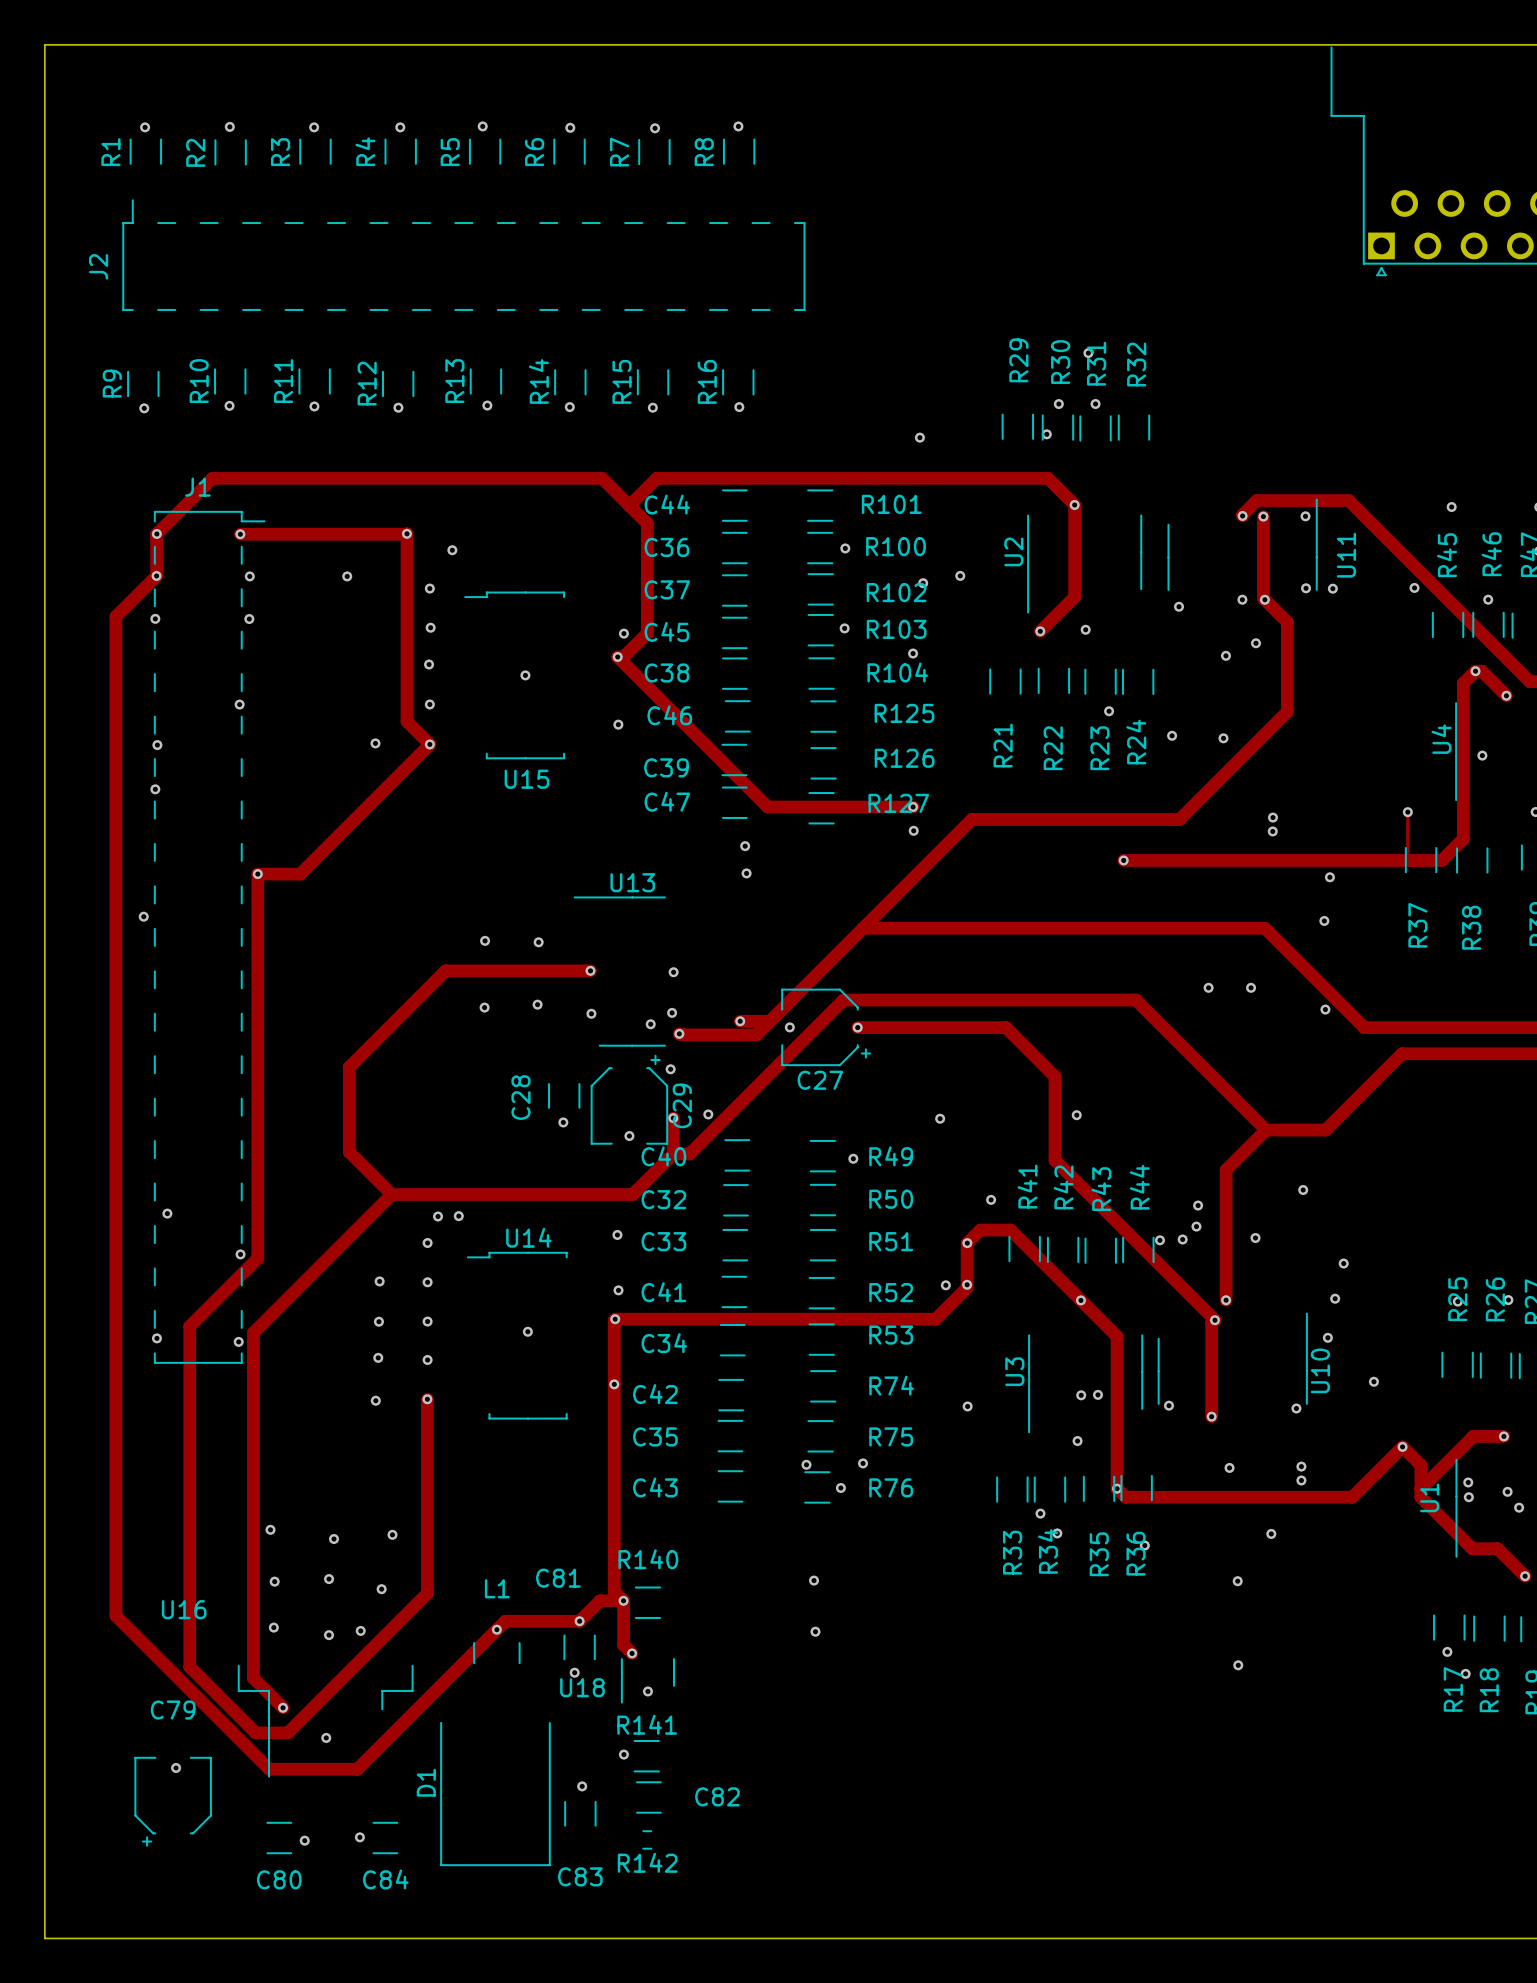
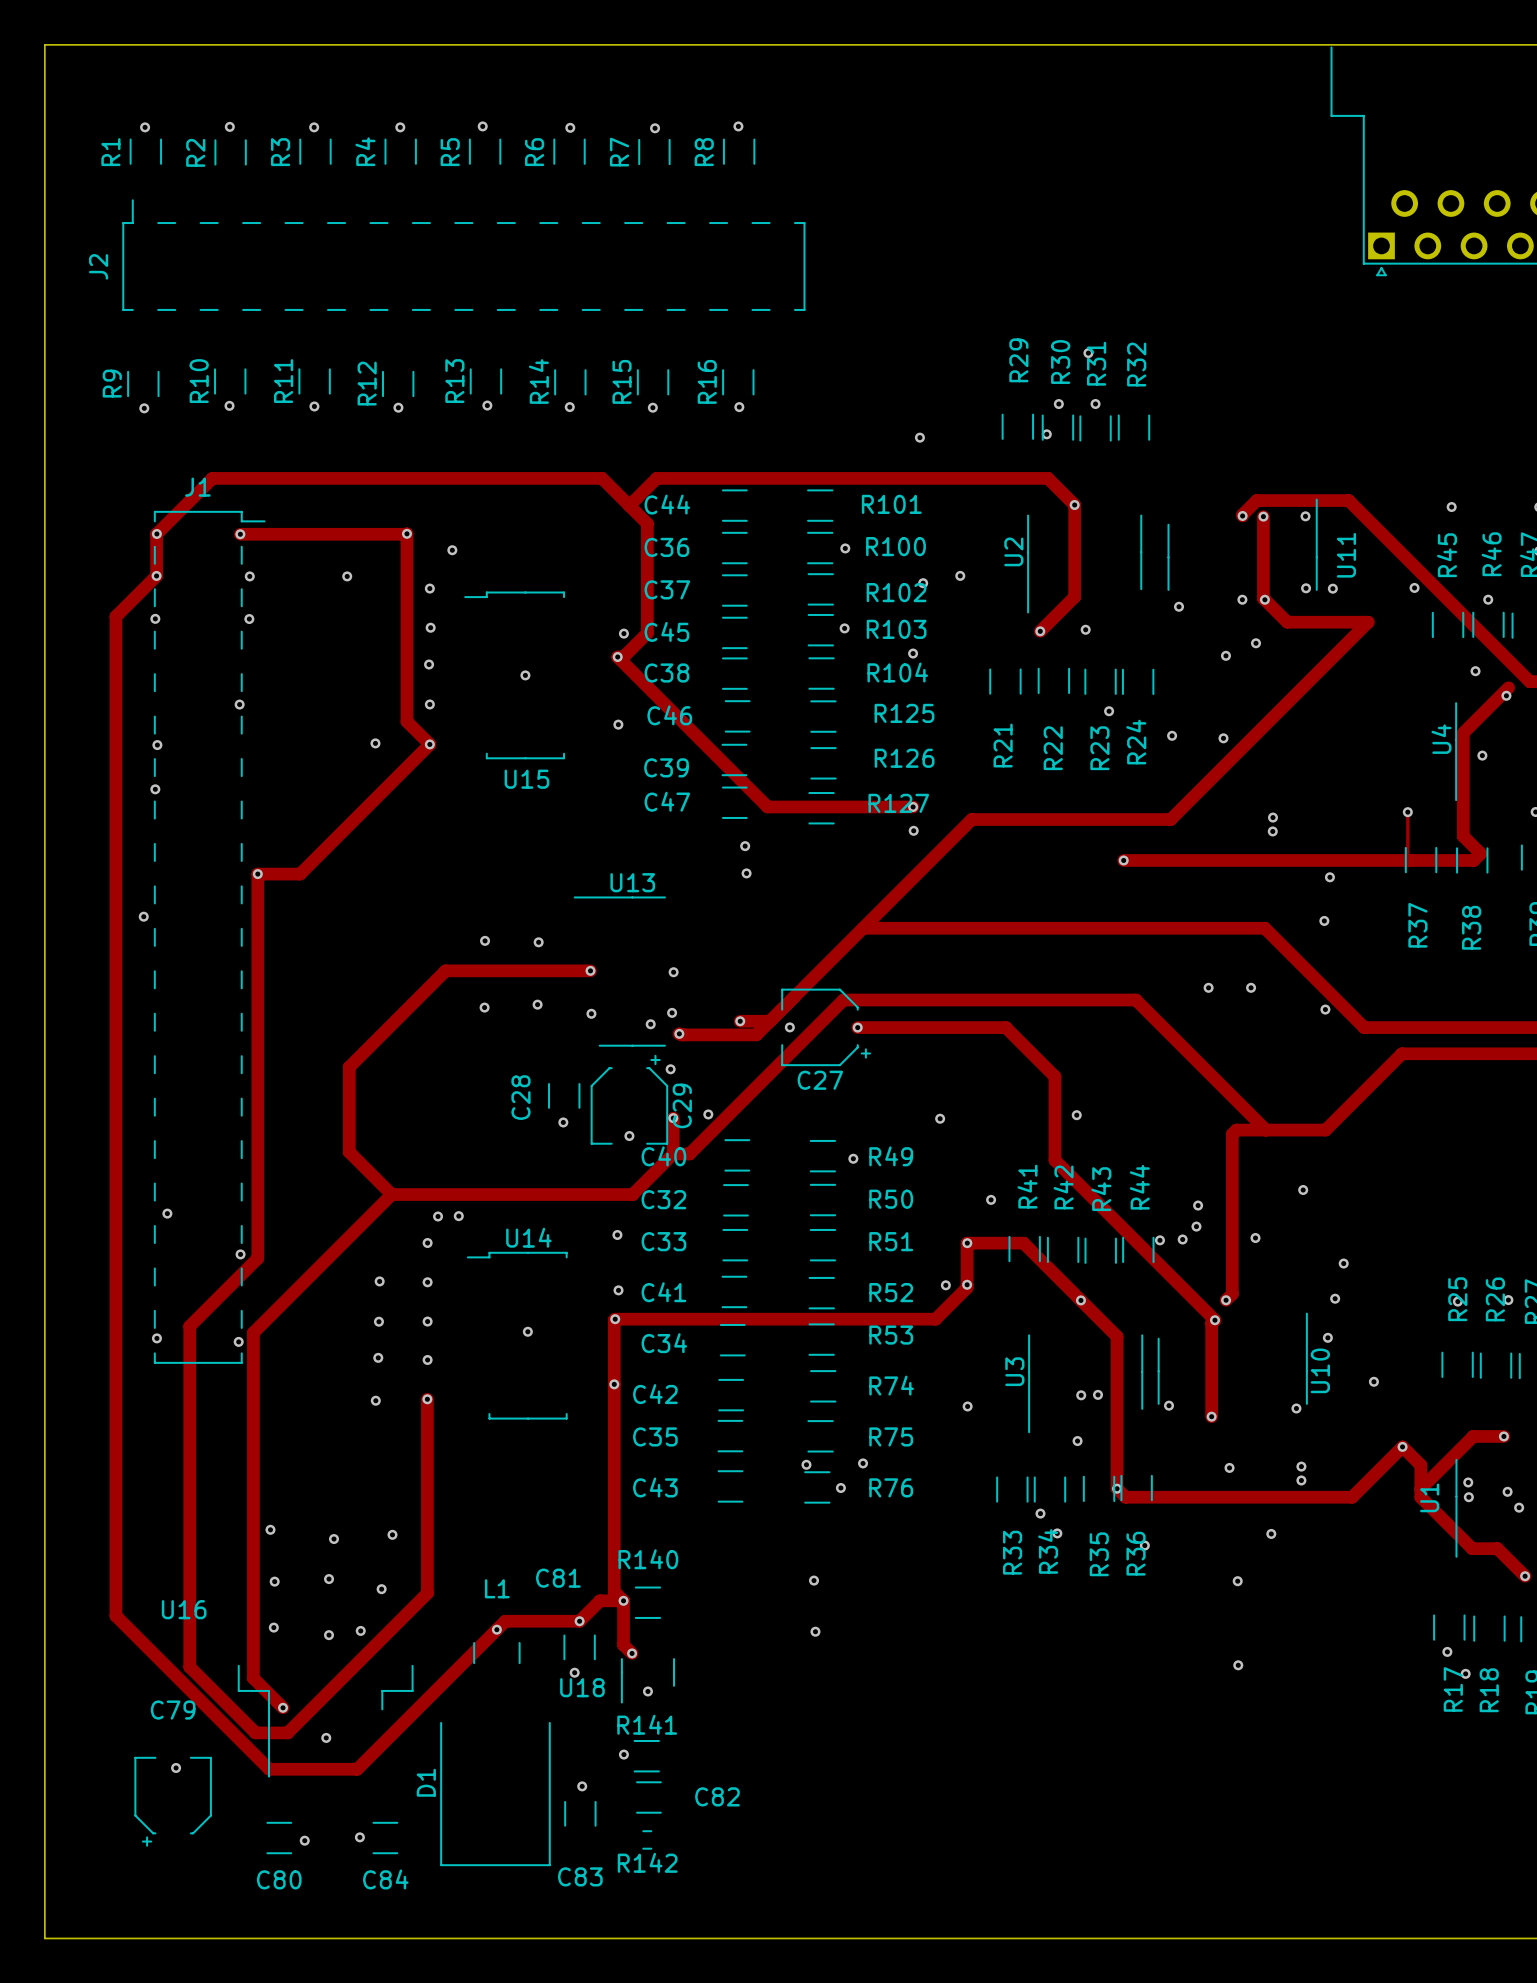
track: (1287, 622) (1287, 711) (1179, 819) (1170, 819) -> (1287, 622) (1368, 622) (1170, 819)
track: (1506, 695) (1481, 671) (1475, 671) (1463, 683) (1463, 733) -> (1508, 687) (1463, 733)
track: (1463, 836) (1463, 838) (1441, 860) -> (1463, 836) (1480, 853) (1473, 860) (1441, 860)
track: (1266, 1130) (1226, 1169) (1226, 1300) -> (1266, 1130) (1236, 1130) (1232, 1134) (1232, 1293) (1226, 1300)
track: (967, 1243) (980, 1230) (1010, 1230) (1023, 1243) -> (967, 1243) (1023, 1243)

